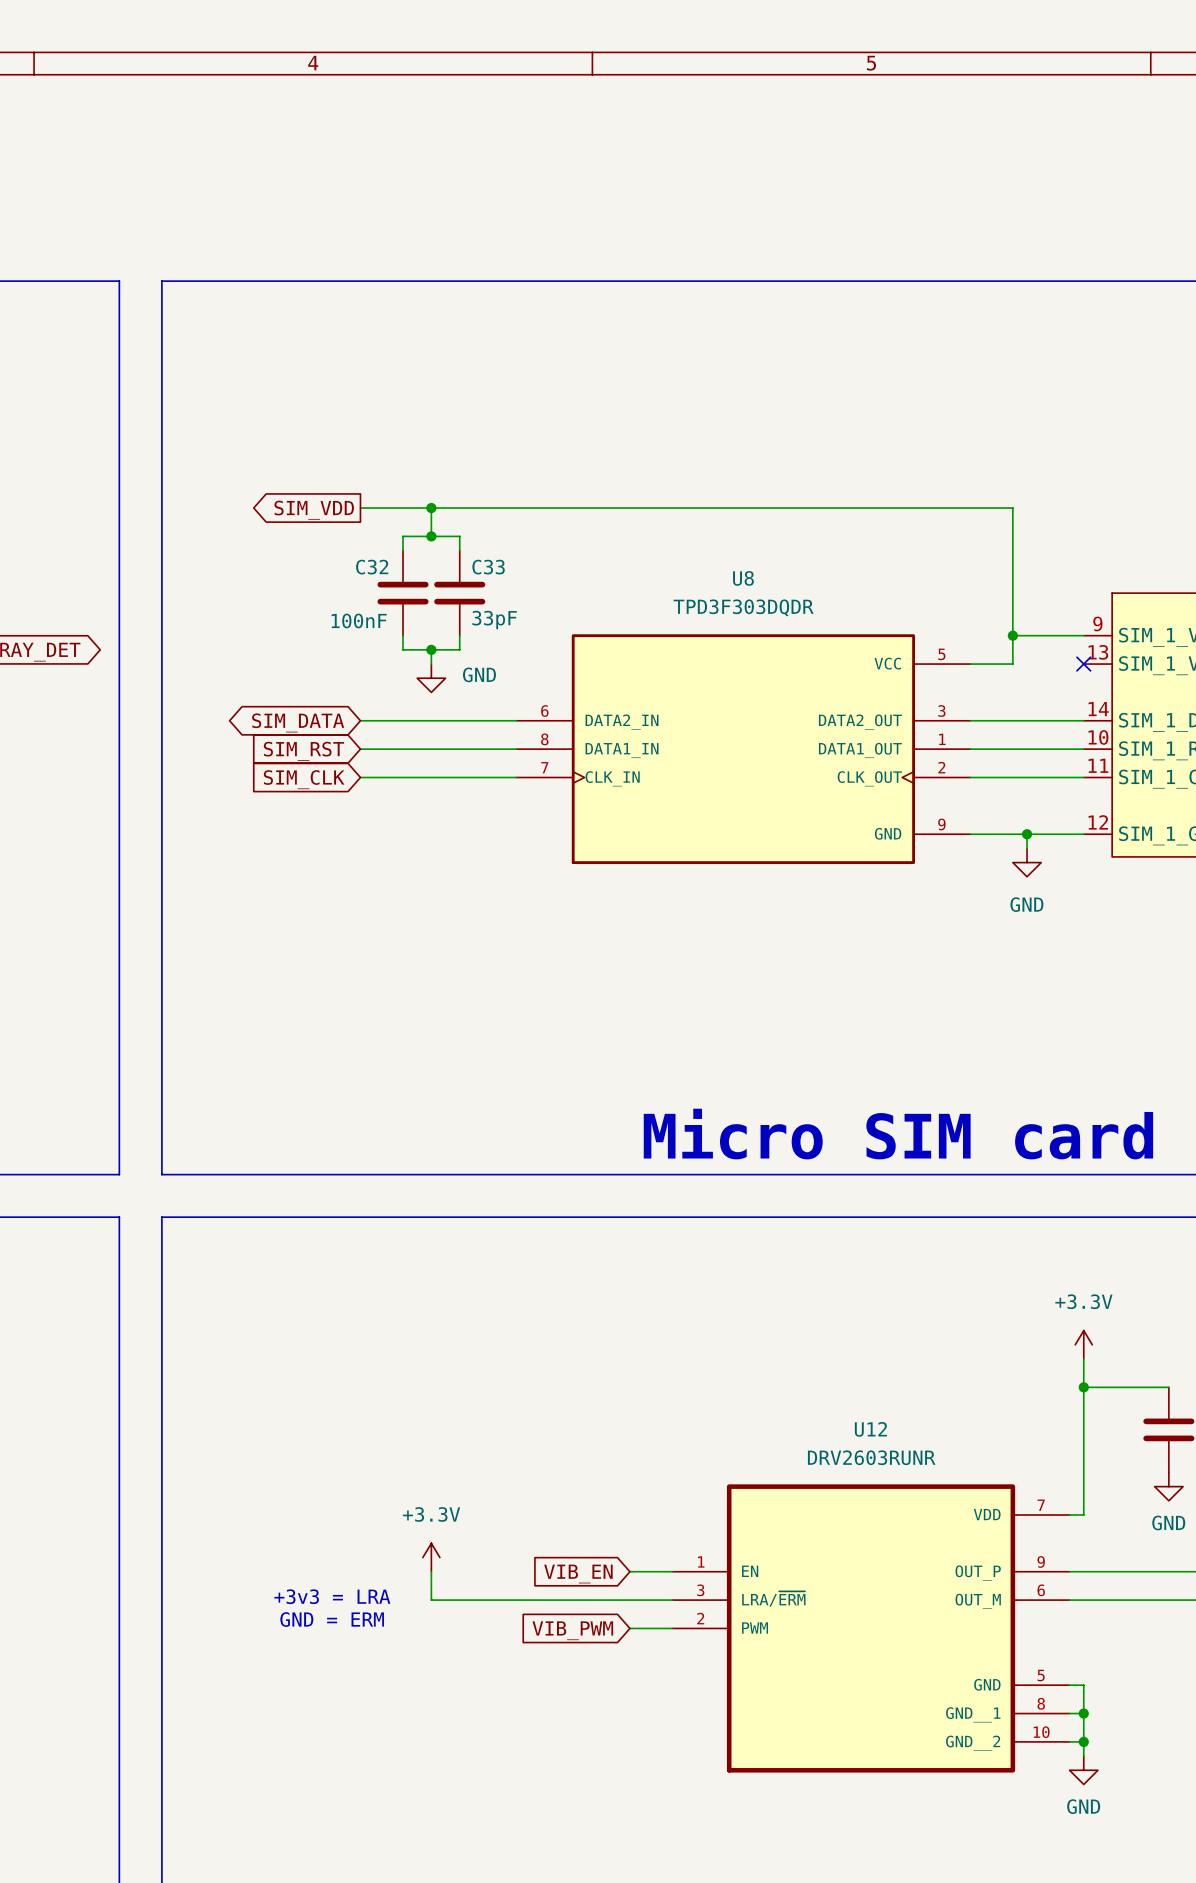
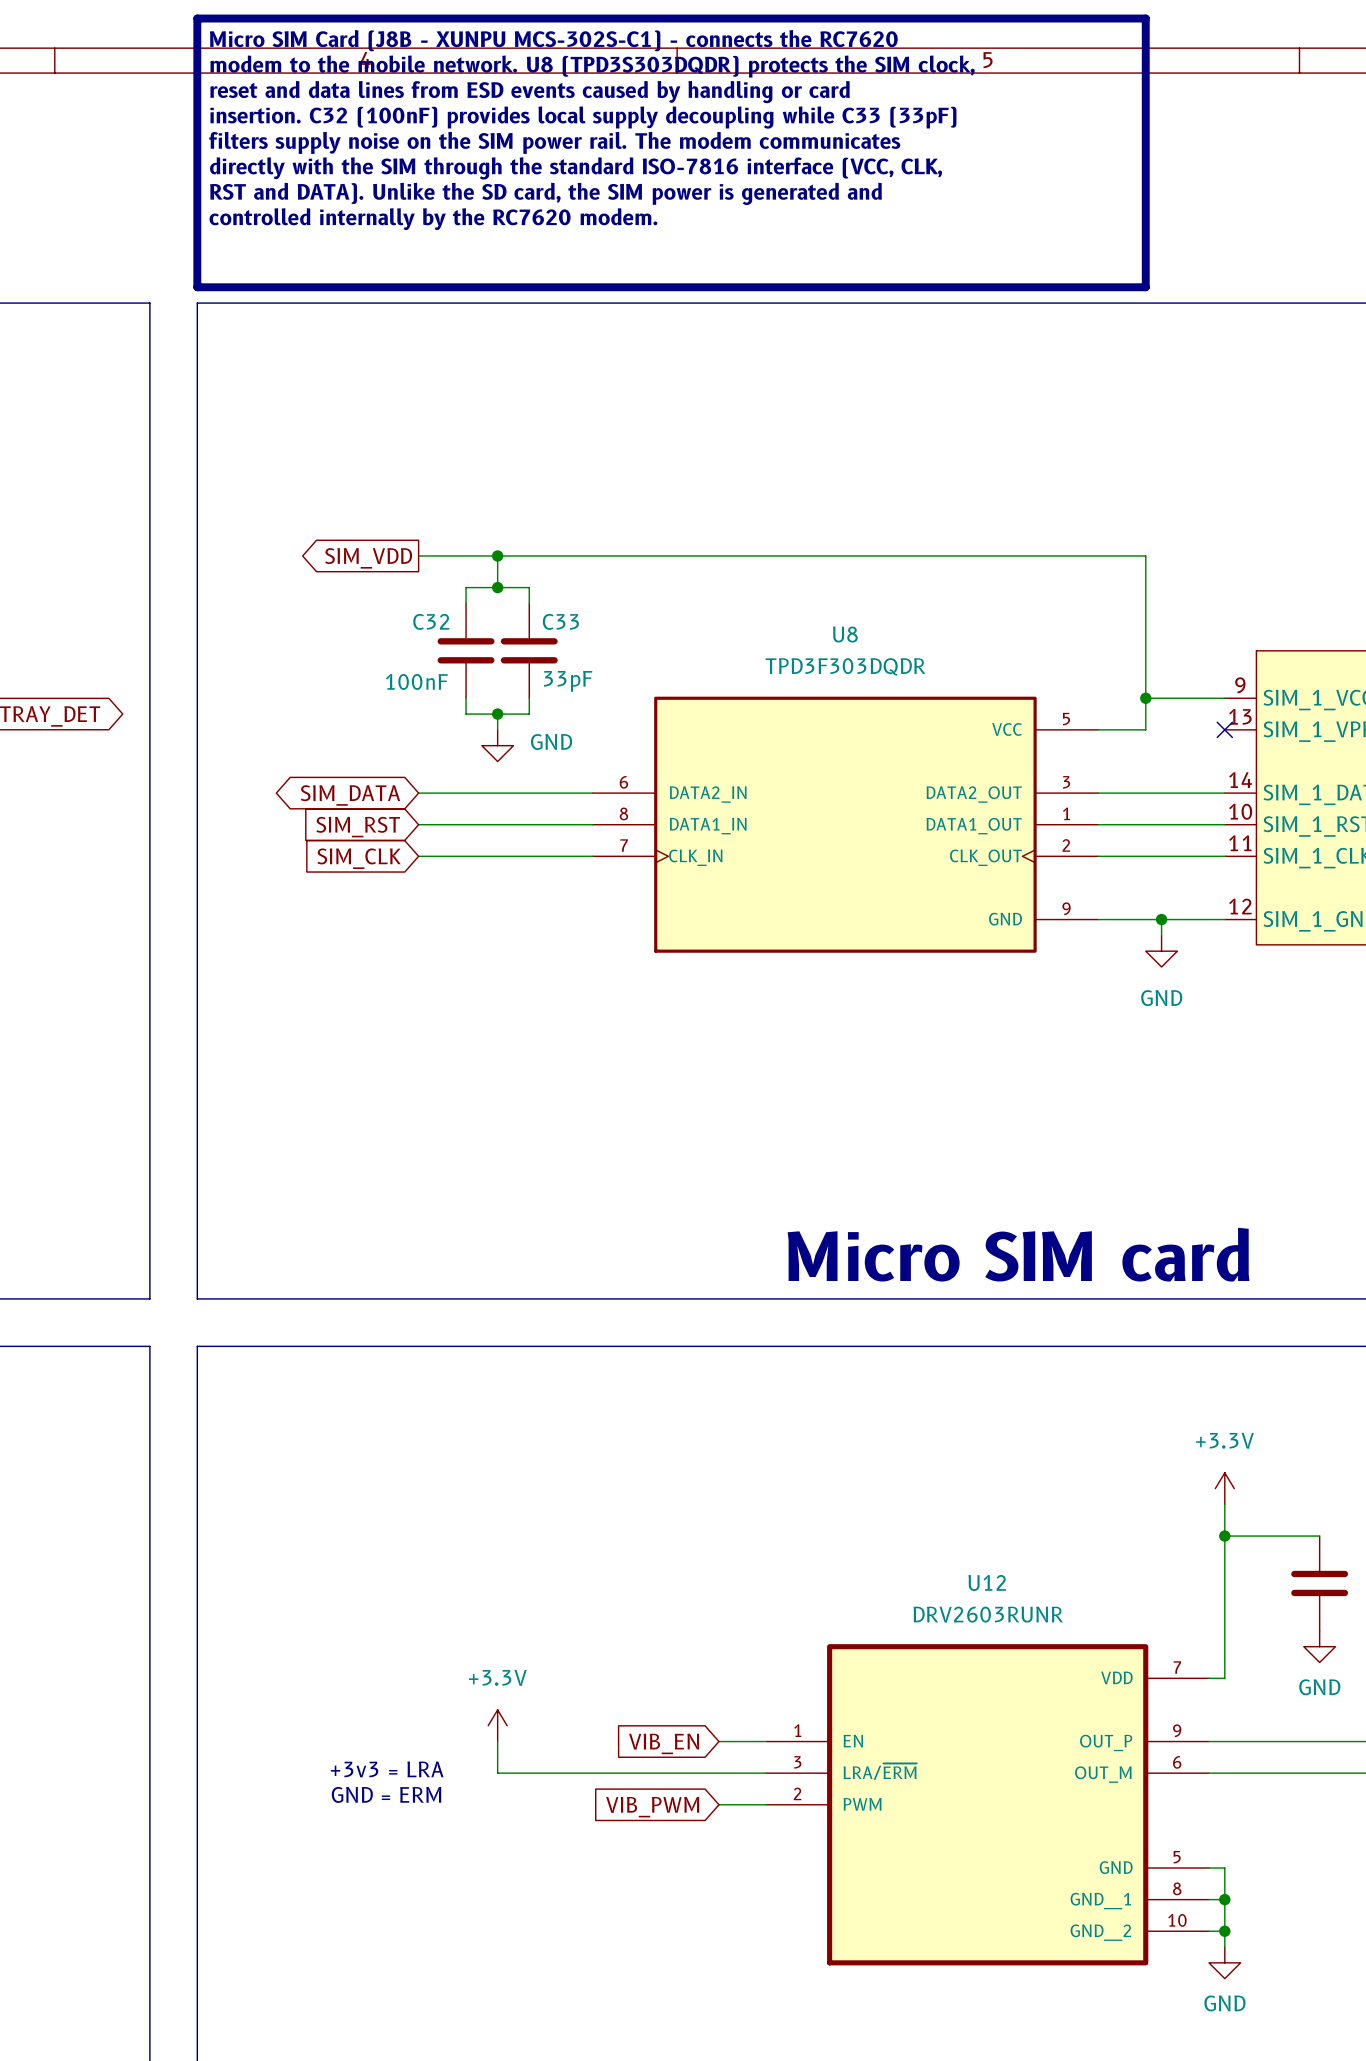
line: none -> (197, 18) (1145, 18) (1145, 287) (197, 287) (197, 18)
text: none -> Micro SIM Card (J8B - XUNPU MCS-302S-C1) - connects the RC7620 (553, 40)
text: none -> modem to the mobile network. U8 (TPD3S303DQDR) protects the SIM clock, (592, 66)
text: none -> reset and data lines from ESD events caused by handling or card (530, 92)
text: none -> insertion. C32 (100nF) provides local supply decoupling while C33 (33pF) (583, 117)
text: none -> filters supply noise on the SIM power rail. The modem communicates (554, 142)
text: none -> directly with the SIM through the standard ISO-7816 interface (VCC, CLK, (576, 168)
text: none -> RST and DATA). Unlike the SD card, the SIM power is generated and (545, 193)
text: none -> controlled internally by the RC7620 modem. (433, 219)

